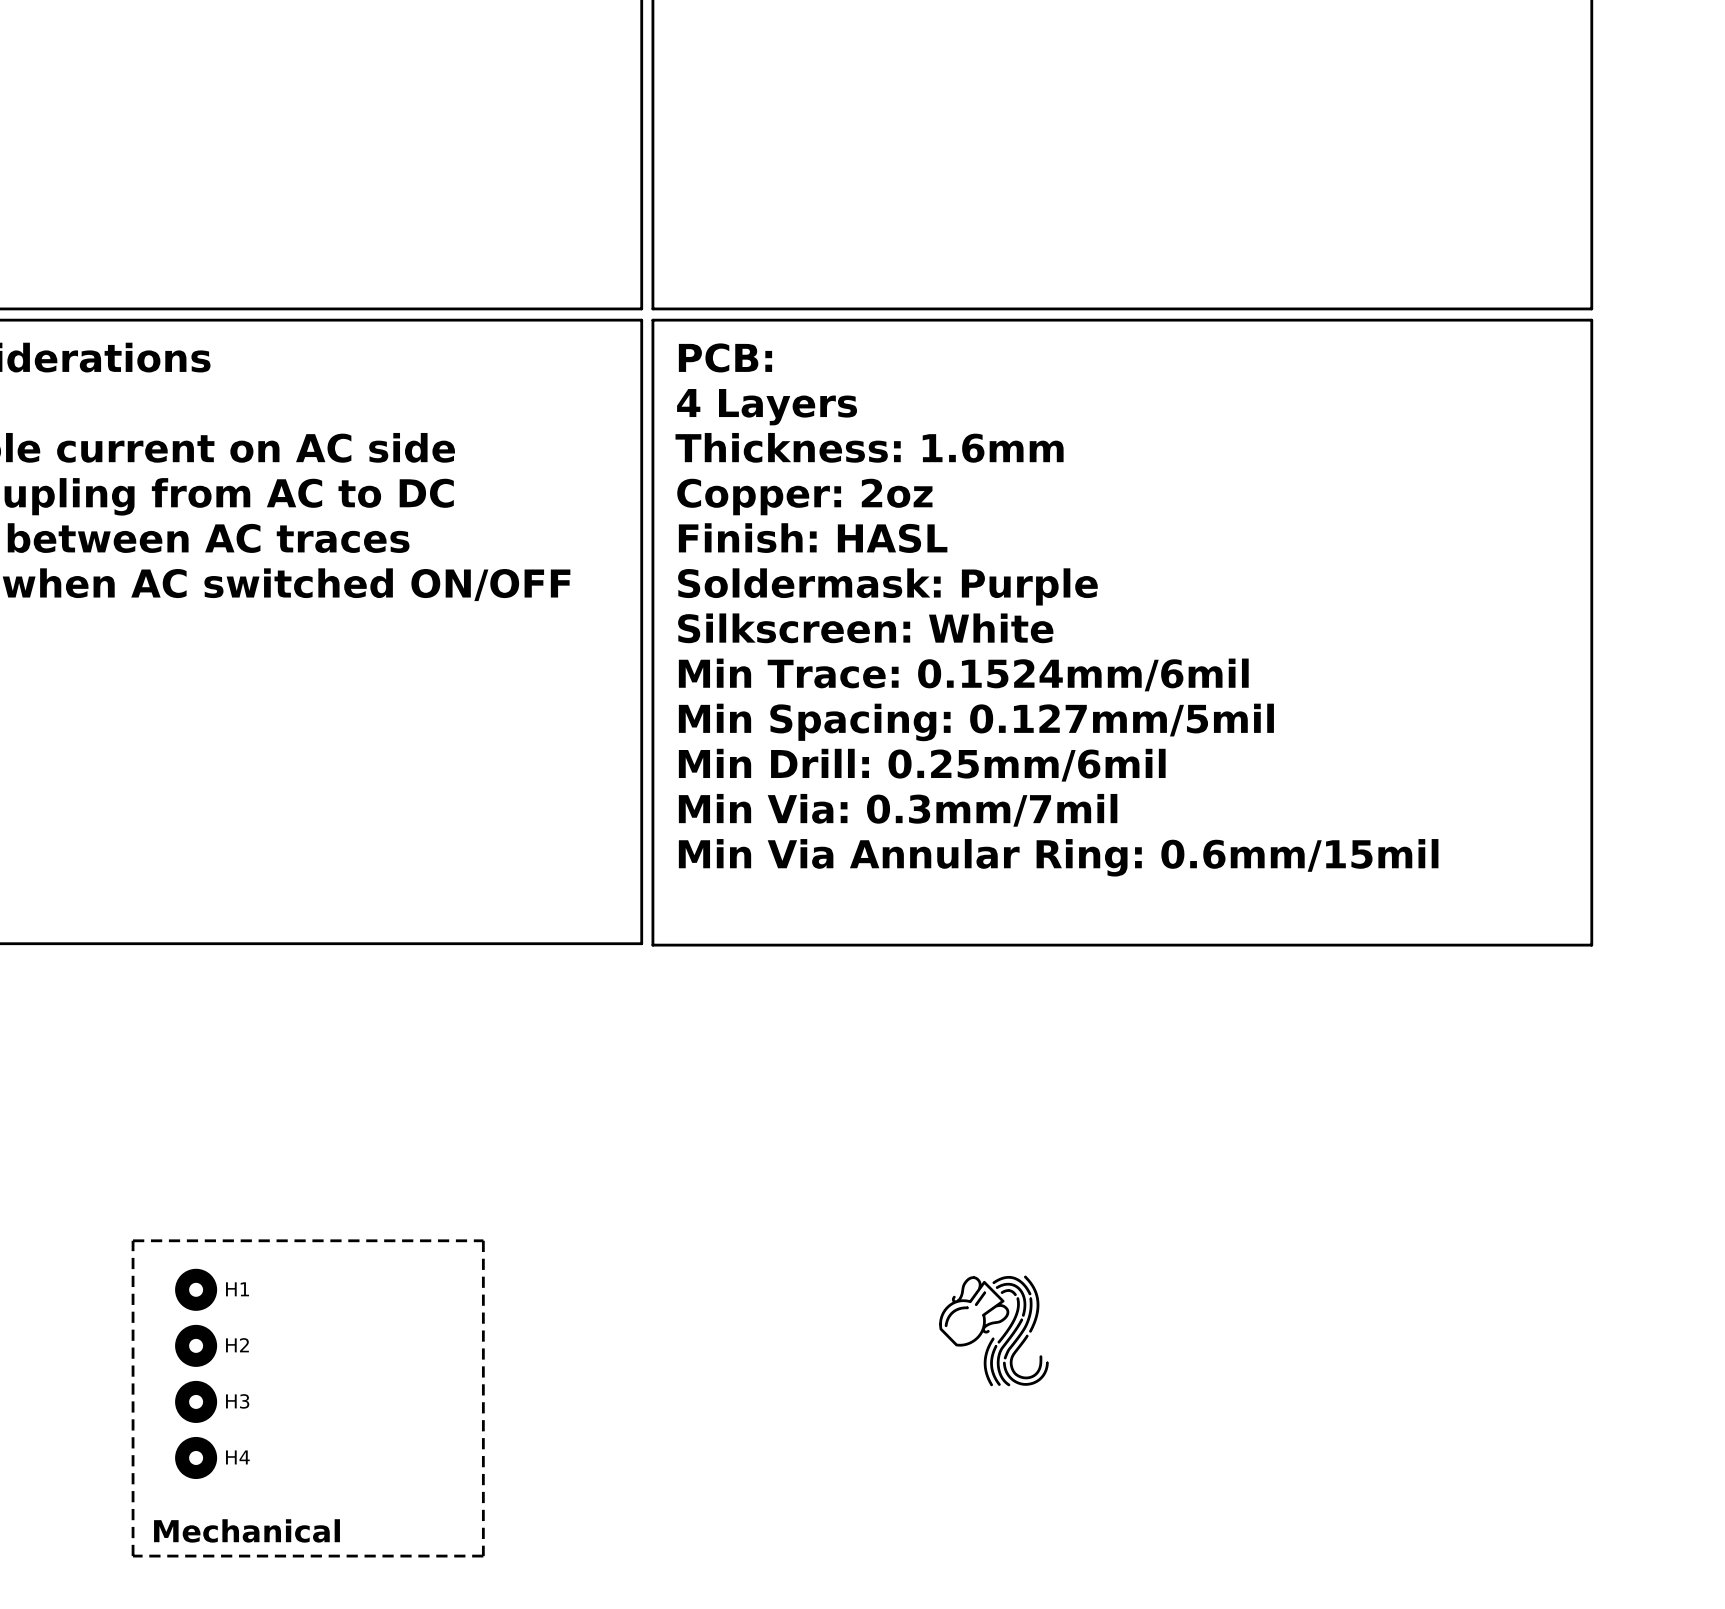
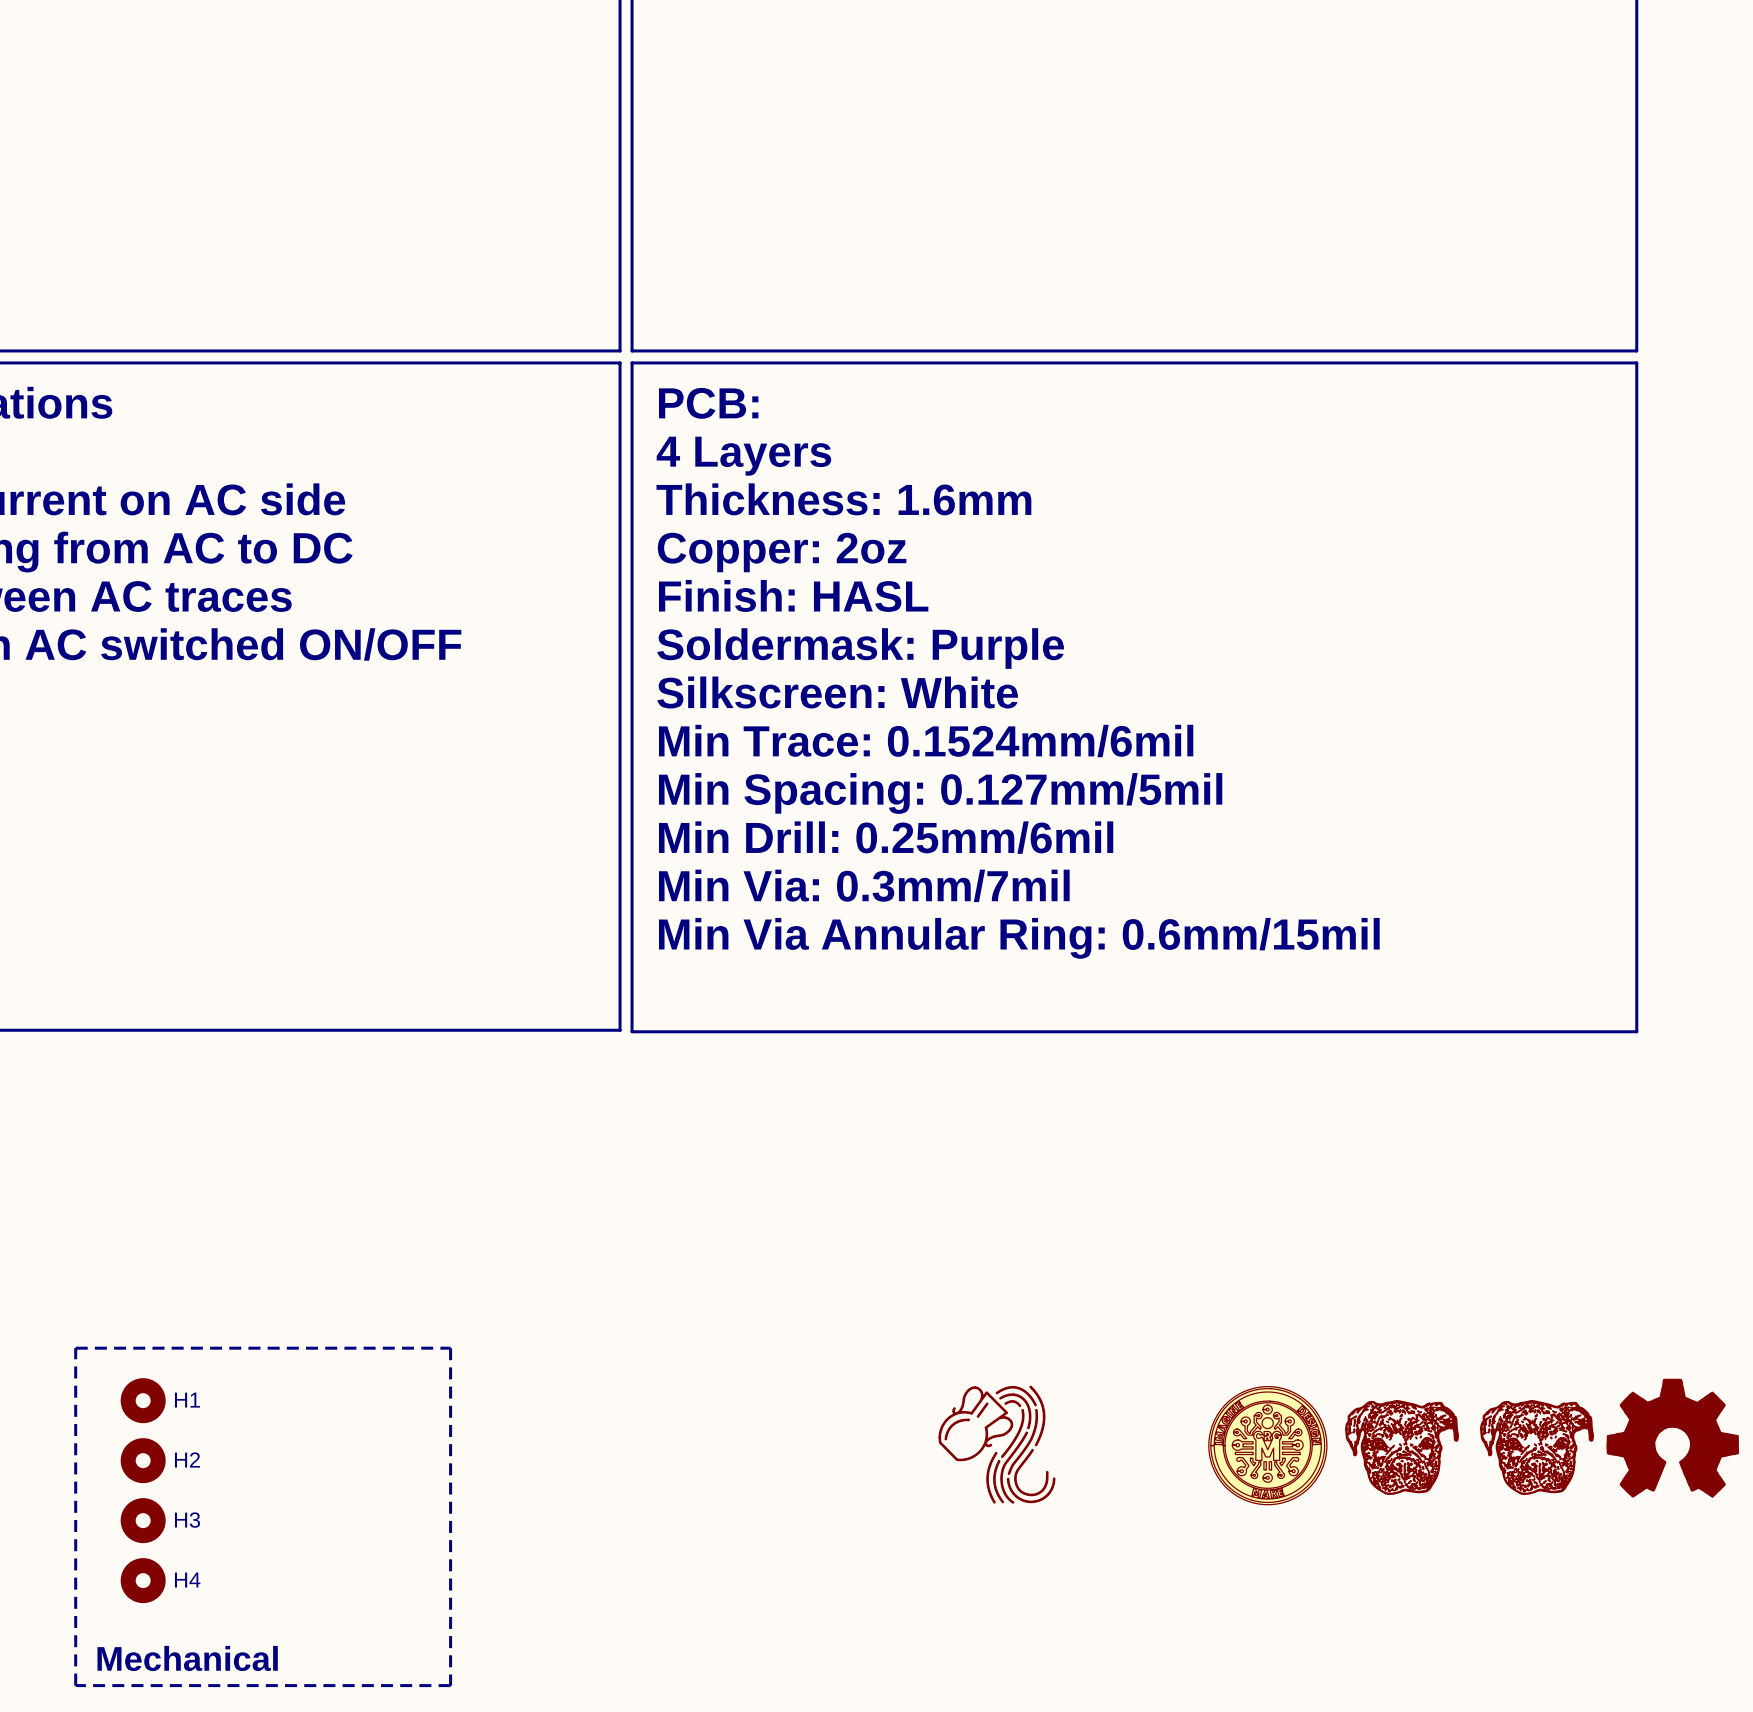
part: none -> (1672, 1438)
part: none -> (1267, 1445)
part: none -> (1402, 1447)
part: none -> (1537, 1447)

